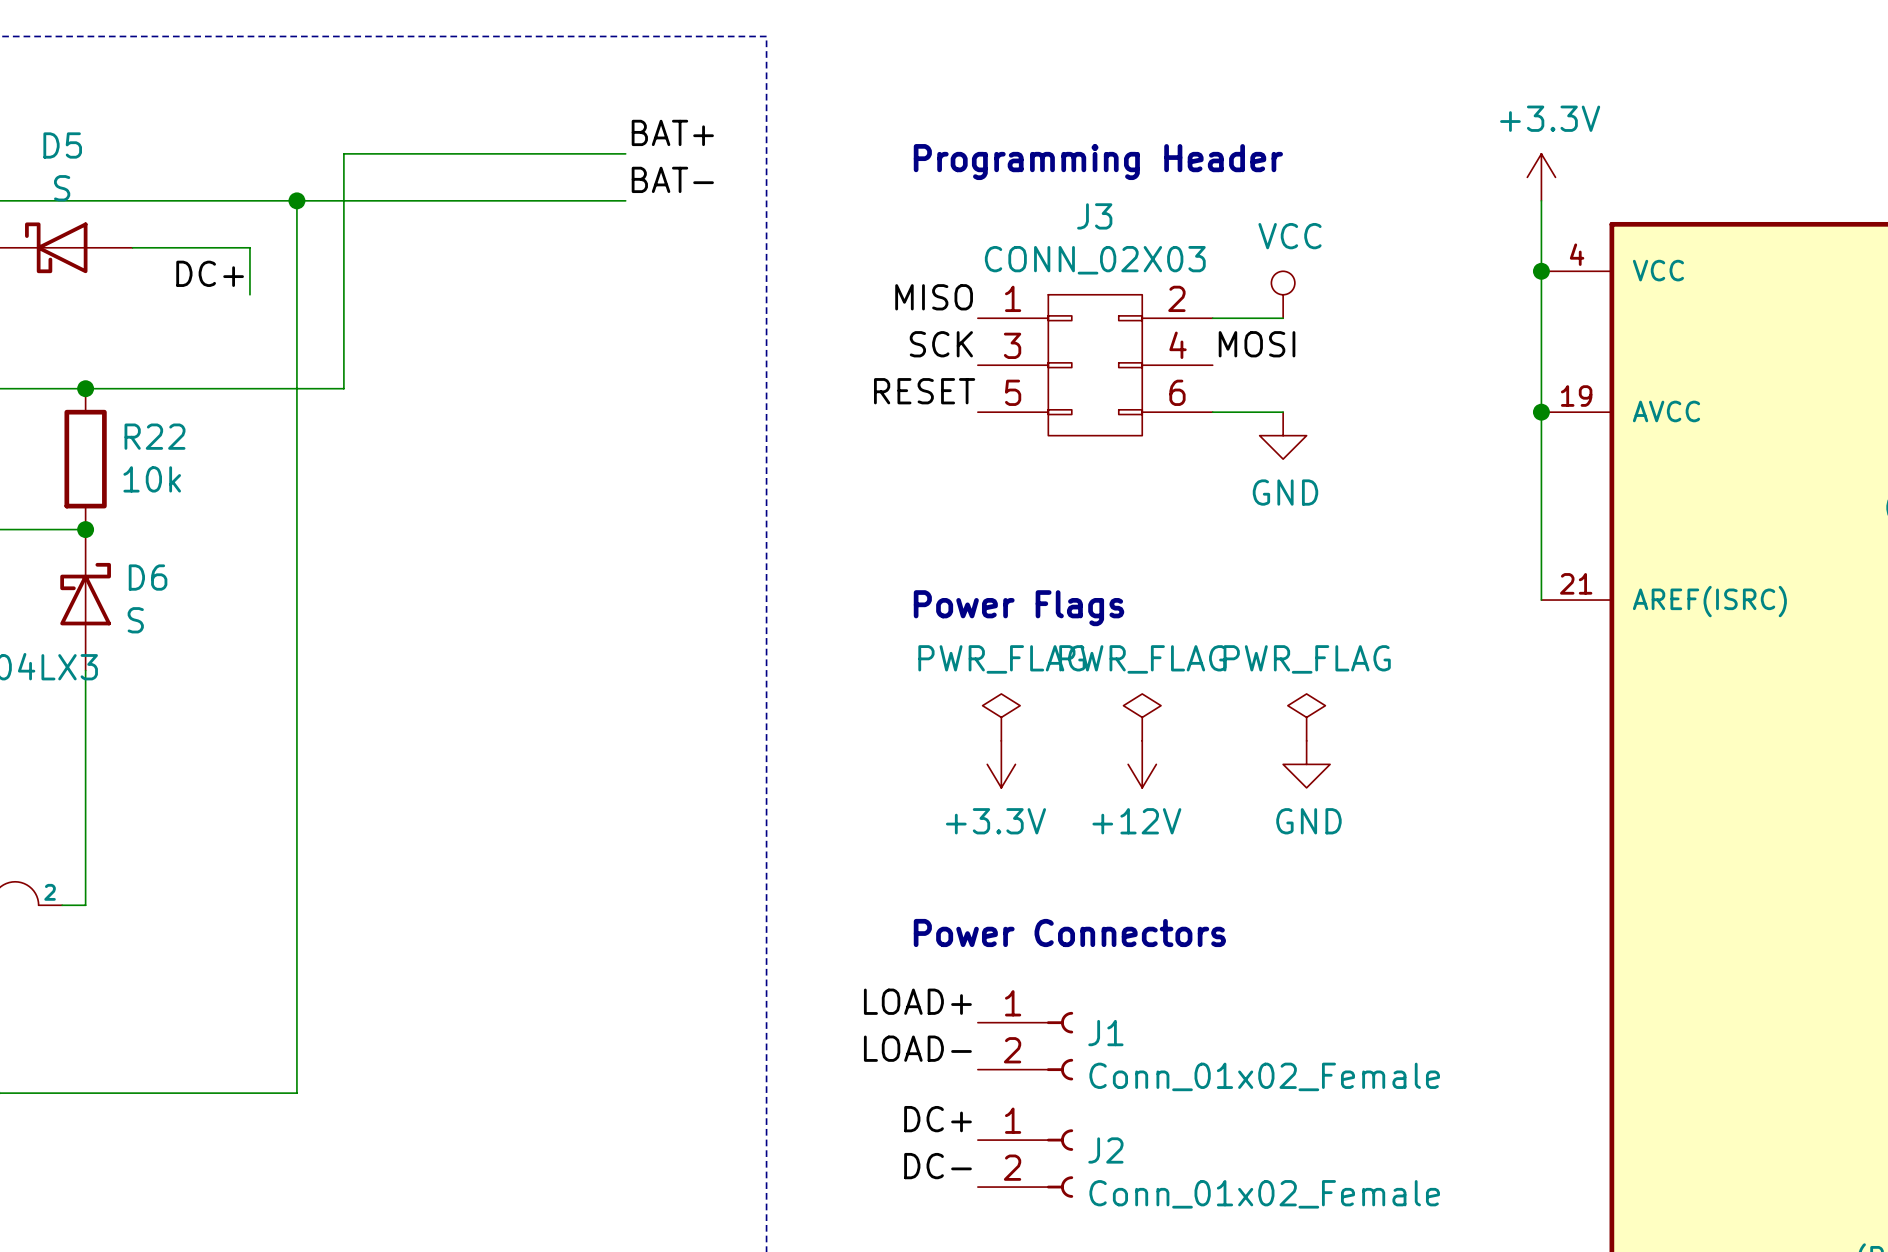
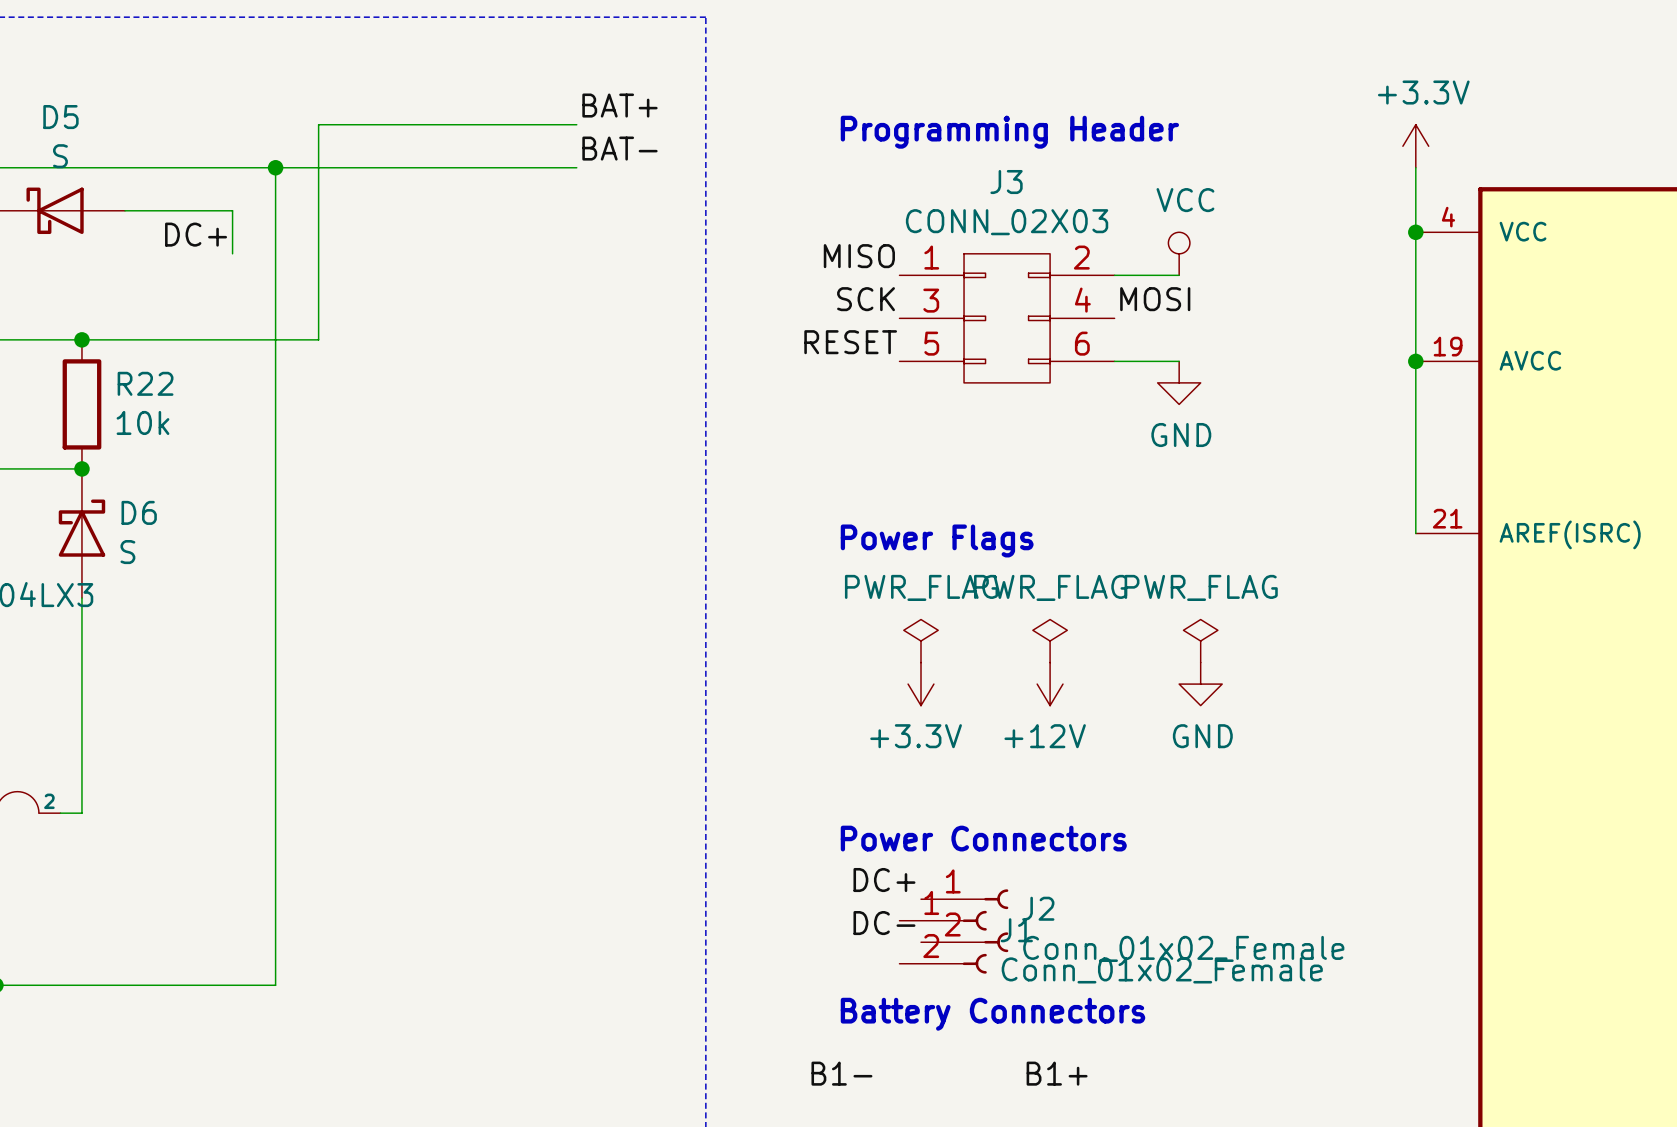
label: LOAD+ (917, 1001) -> none
label: LOAD- (917, 1048) -> none
label position: DC+ (938, 1119) -> DC+ (884, 880)
text: none -> Battery Connectors (992, 1014)
J2 position: (1025, 1163) -> (964, 920)
label position: DC- (938, 1166) -> DC- (884, 923)
label: none -> B1- (841, 1073)
label: none -> B1+ (1057, 1073)

